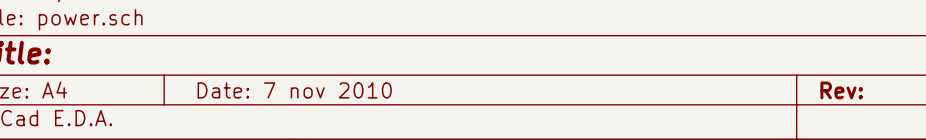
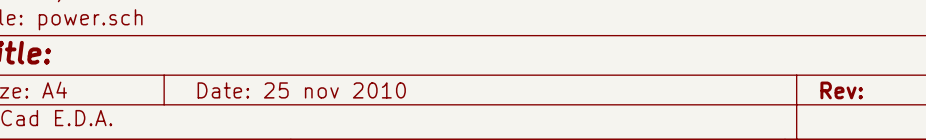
title block: Date: 7 nov 2010 (294, 90) -> Date: 25 nov 2010 (301, 90)

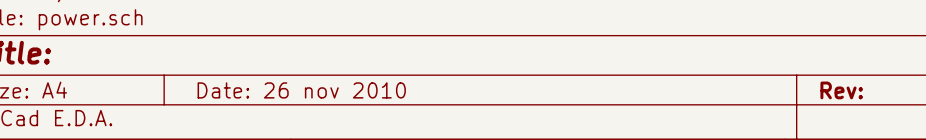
title block: Date: 25 nov 2010 (301, 90) -> Date: 26 nov 2010 (301, 90)

